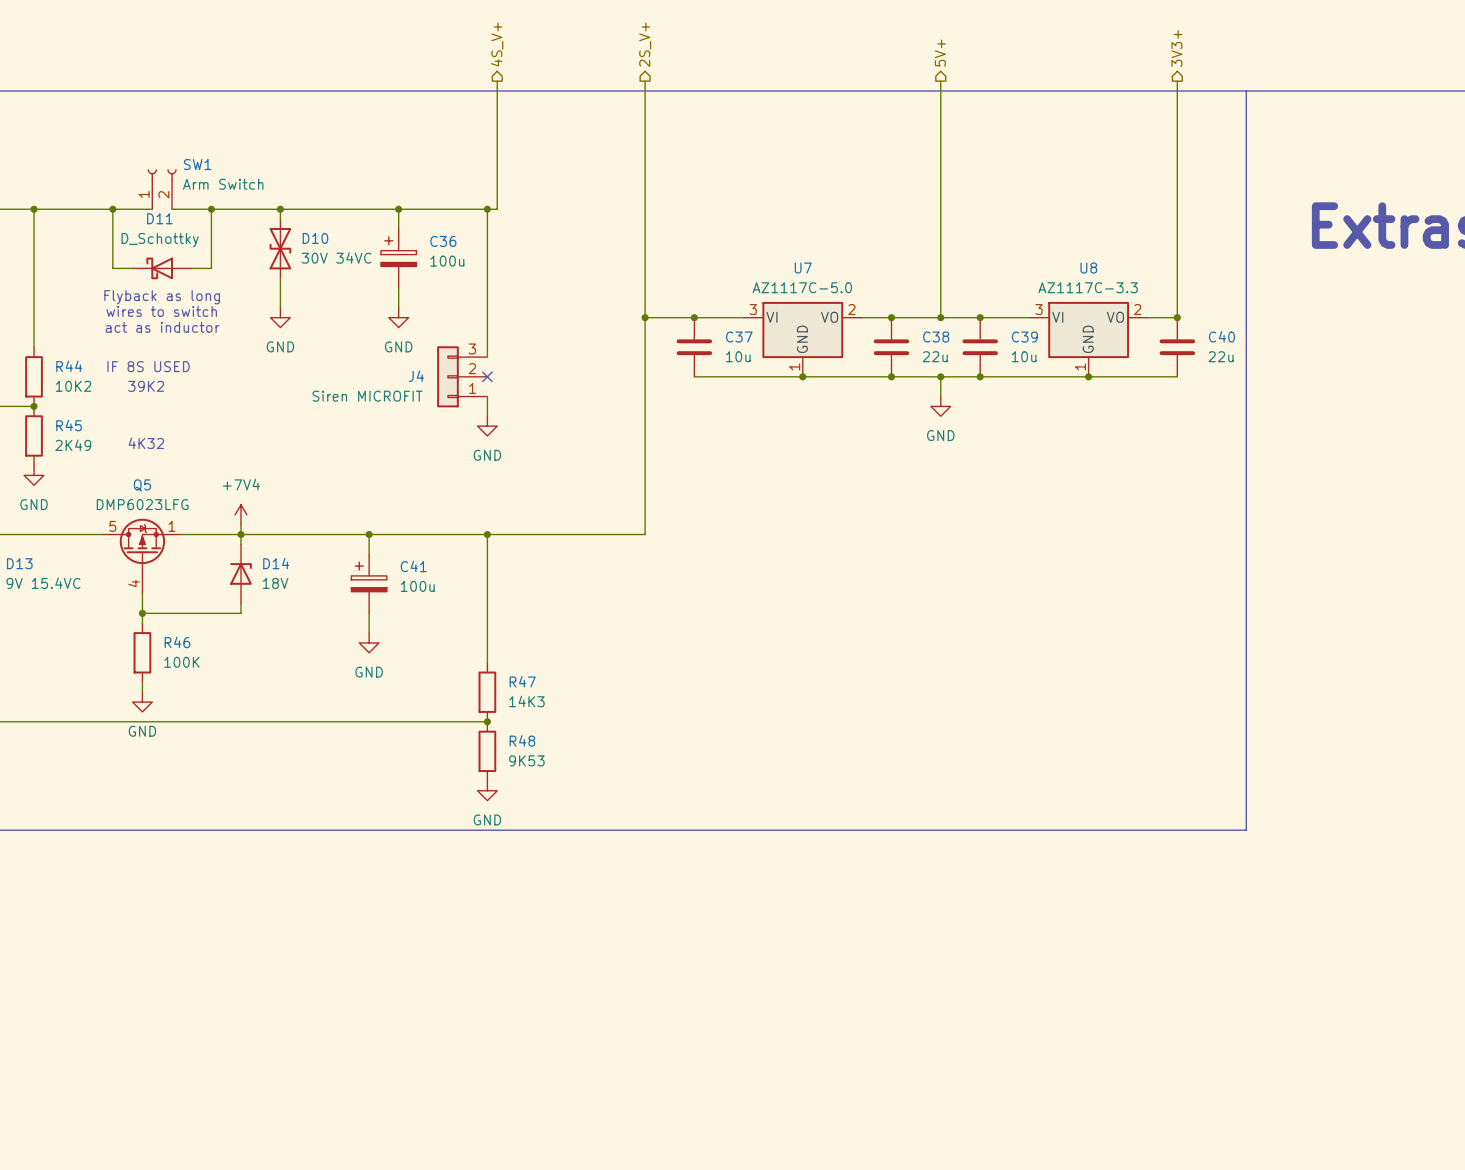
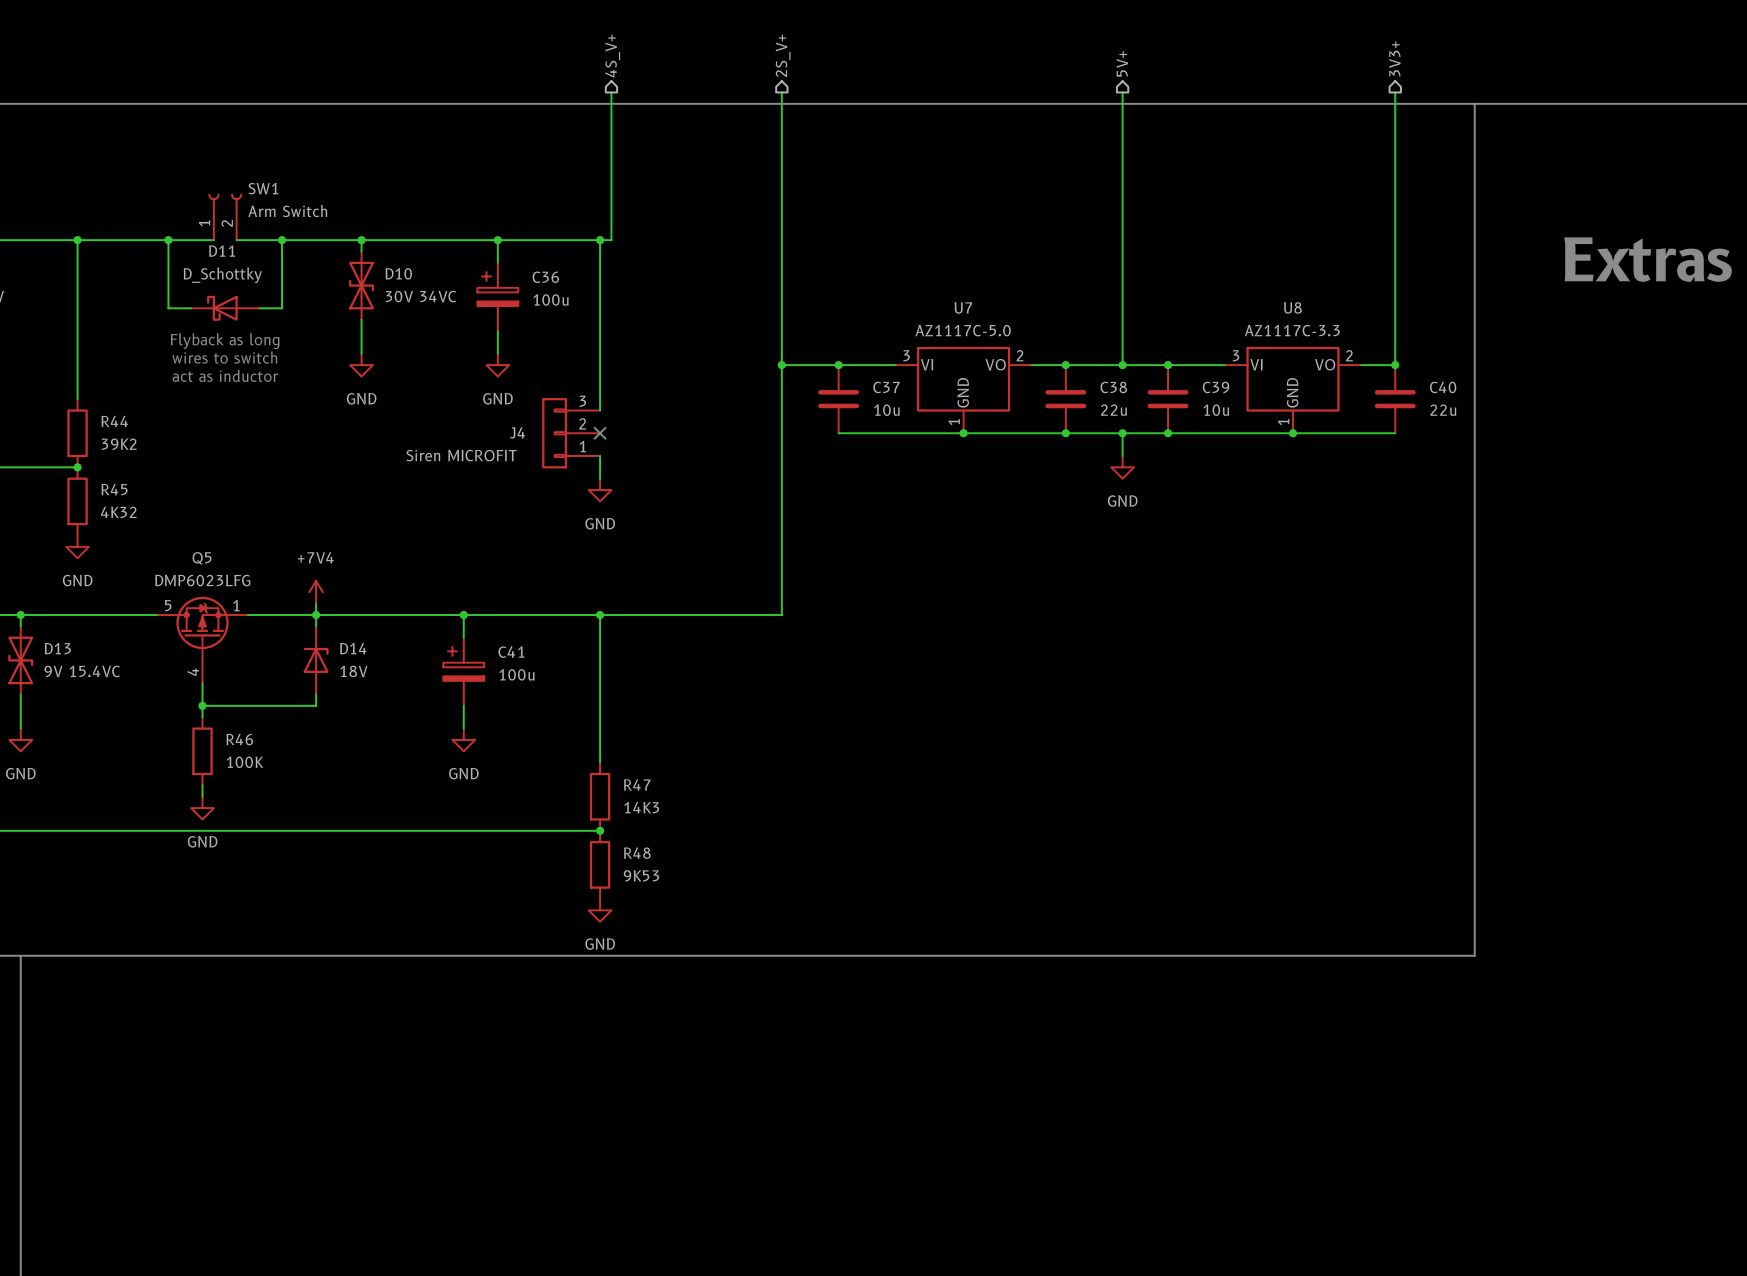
text: IF 8S USED (148, 366) -> none
R44 value: 10K2 (73, 386) -> 39K2 (119, 444)
text: 39K2 (146, 386) -> none
text: 4K32 (146, 443) -> none
R45 value: 2K49 (73, 445) -> 4K32 (118, 512)

